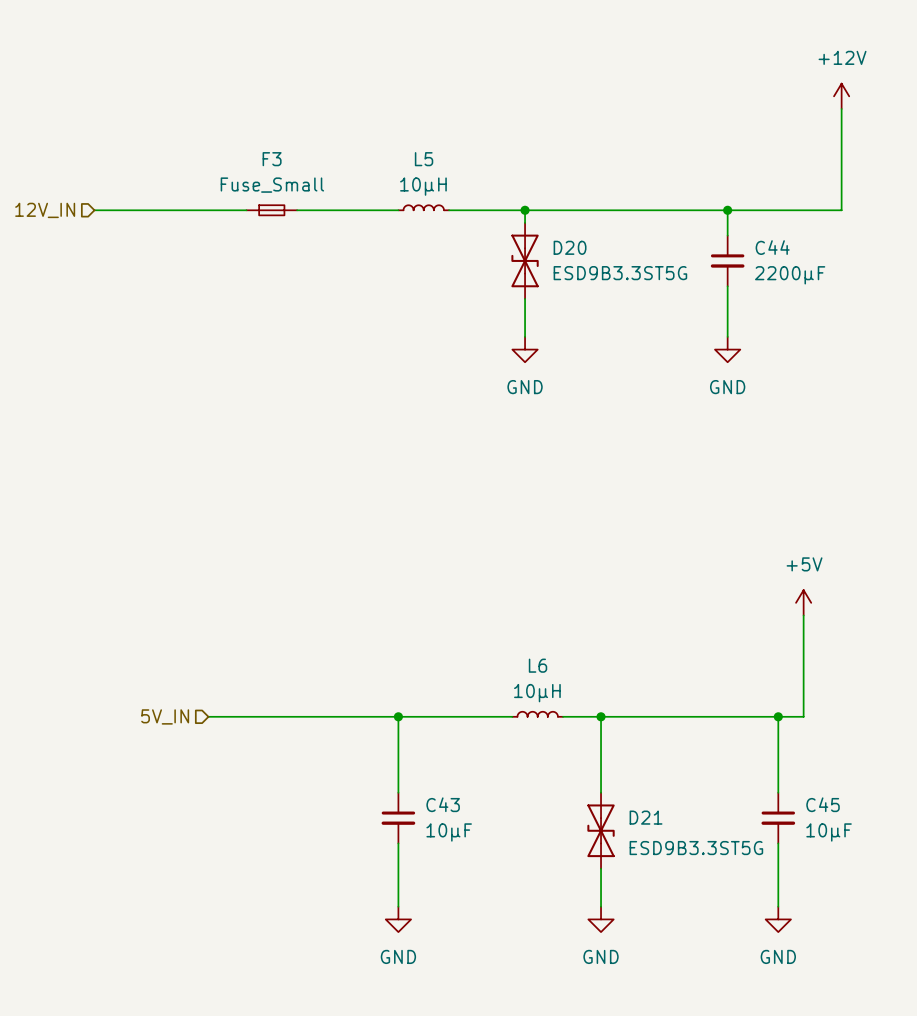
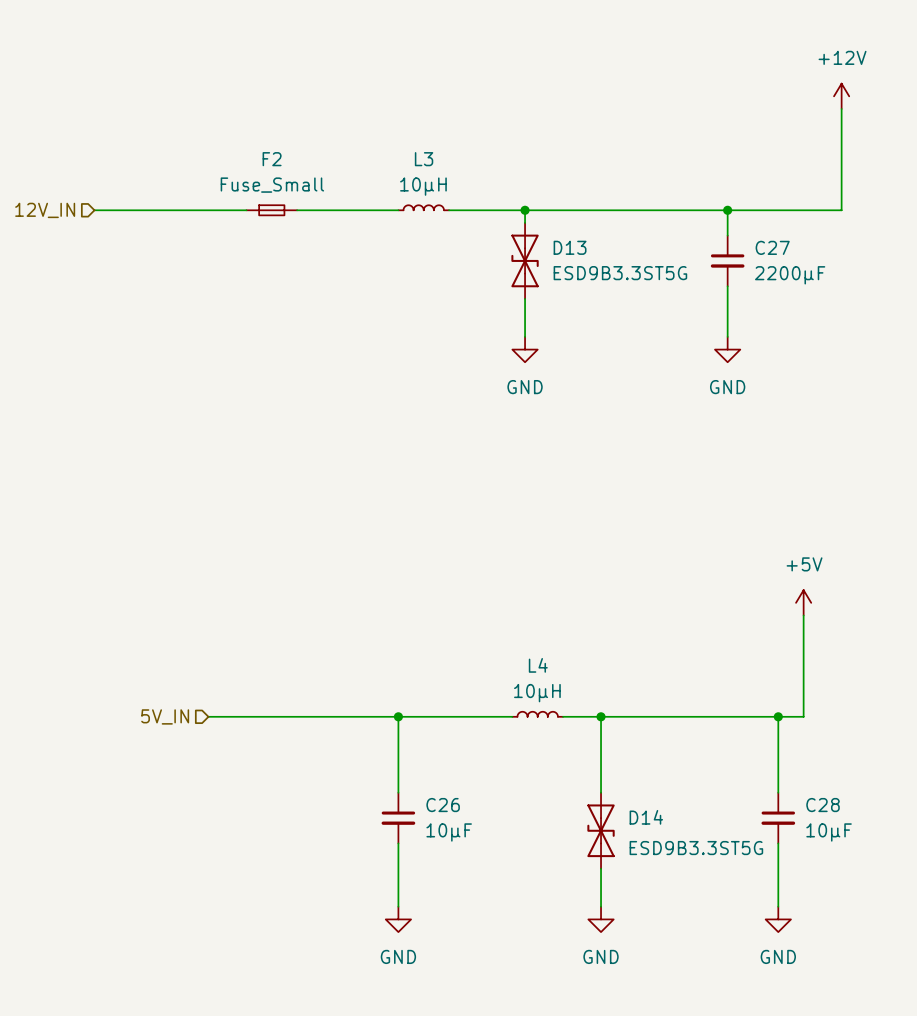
F3 name: F3 (272, 159) -> F2 (272, 159)
L5 name: L5 (424, 159) -> L3 (424, 159)
D20 name: D20 (570, 247) -> D13 (570, 247)
C44 name: C44 (772, 247) -> C27 (772, 247)
L6 name: L6 (538, 665) -> L4 (538, 665)
C43 name: C43 (443, 804) -> C26 (443, 805)
C45 name: C45 (823, 804) -> C28 (823, 805)
D21 name: D21 (646, 817) -> D14 (646, 817)

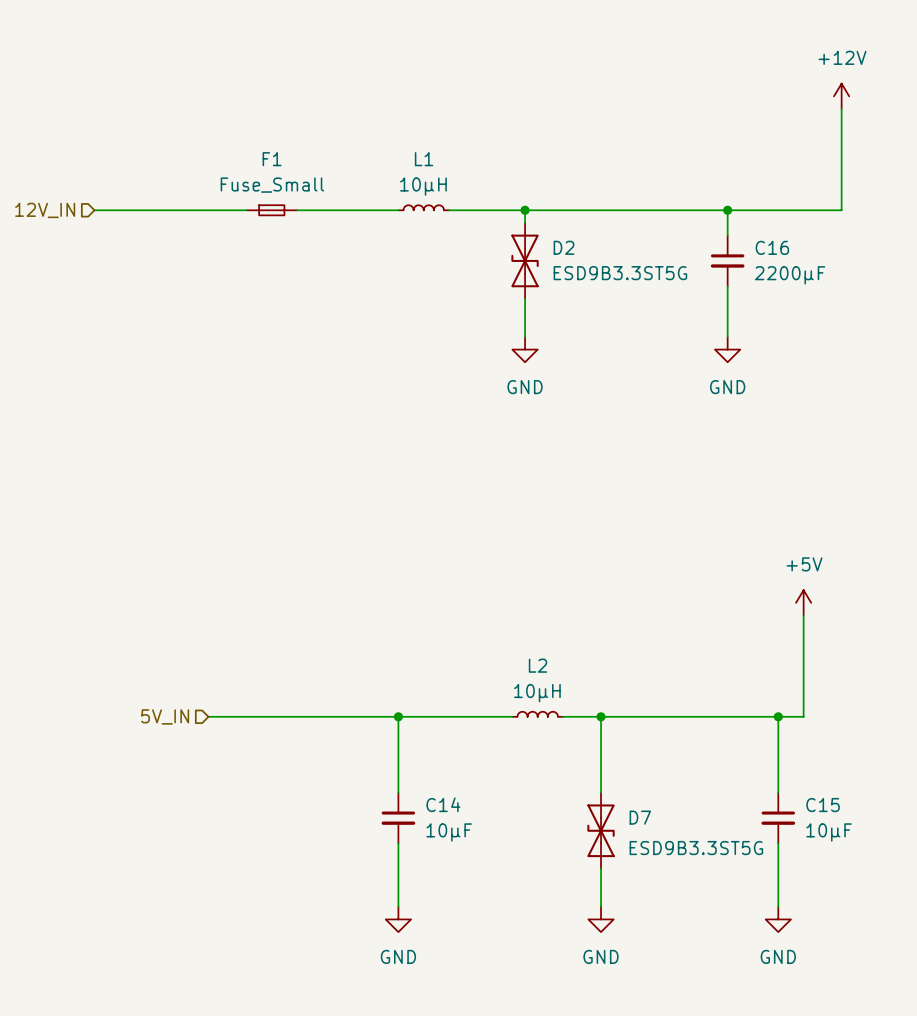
F2 name: F2 (272, 159) -> F1 (272, 159)
L3 name: L3 (424, 159) -> L1 (424, 159)
D13 name: D13 (570, 247) -> D2 (564, 247)
C27 name: C27 (772, 247) -> C16 (772, 247)
L4 name: L4 (538, 665) -> L2 (538, 665)
C26 name: C26 (443, 805) -> C14 (443, 804)
C28 name: C28 (823, 805) -> C15 (823, 805)
D14 name: D14 (646, 817) -> D7 (640, 817)

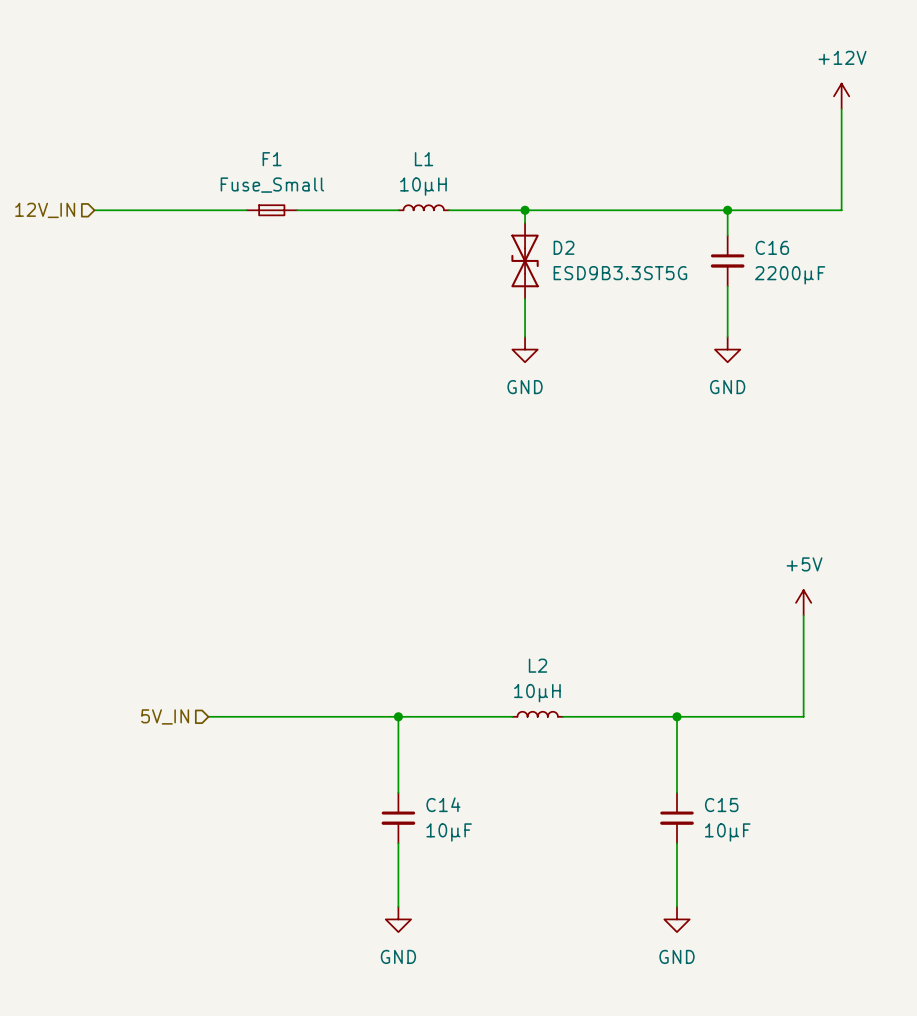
wire: (601, 716) (601, 792) -> none
junction: (601, 716) -> none
junction: none -> (677, 716)
wire: (778, 716) (778, 792) -> (677, 716) (677, 792)
junction: (778, 716) -> none
C15 position: (778, 818) -> (677, 818)
D7: ESD9B3.3ST5G (601, 830) -> none
wire: (778, 843) (778, 906) -> (677, 843) (677, 906)
wire: (601, 868) (601, 906) -> none
power symbol: GND (601, 919) -> none
power symbol: none -> GND (677, 919)
power symbol: GND (778, 919) -> none

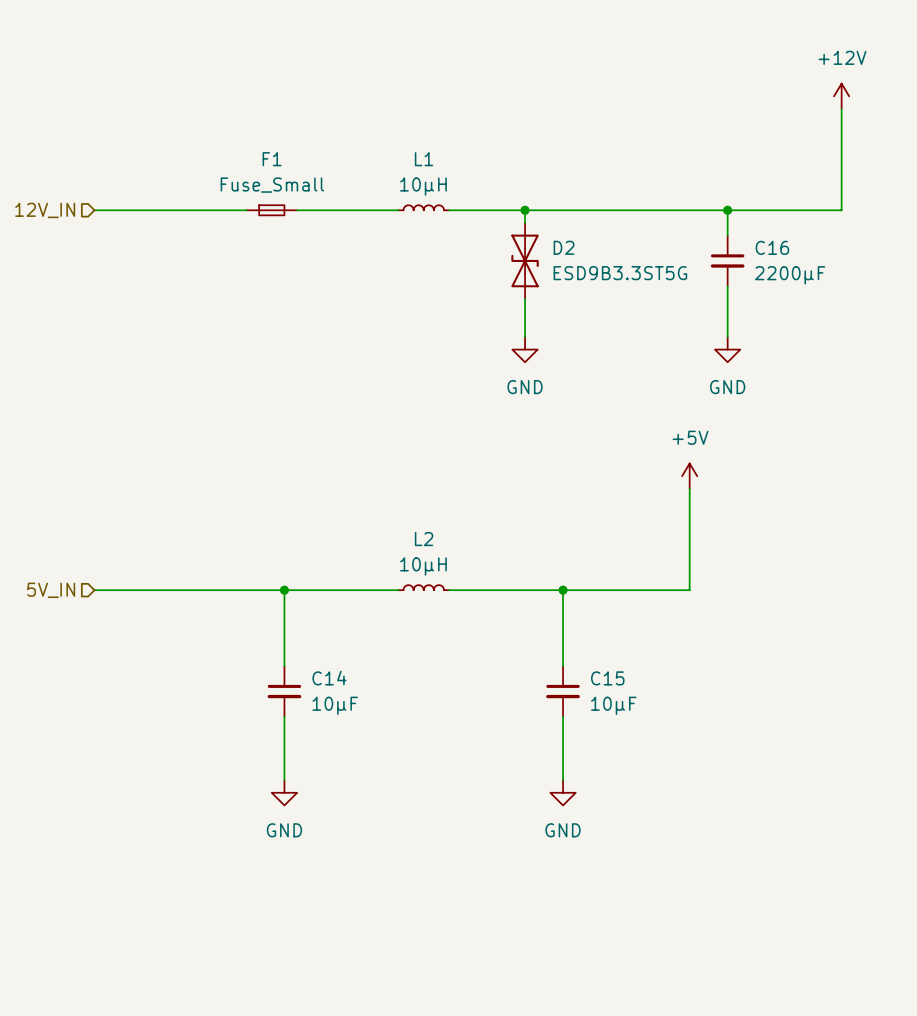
wire: none -> (689, 488) (689, 590) (449, 590)
junction: none -> (284, 590)
junction: none -> (563, 590)
power symbol position: +5V (803, 602) -> +5V (689, 476)
wire: (803, 615) (803, 716) (563, 716) -> (563, 780) (563, 716)
L2 position: (537, 714) -> (423, 587)
hierarchical label position: 5V_IN (165, 716) -> 5V_IN (51, 590)
wire: (208, 716) (512, 716) -> (94, 590) (398, 590)
wire: (398, 716) (398, 792) -> (284, 590) (284, 666)
junction: (398, 716) -> none
wire: (677, 716) (677, 792) -> (563, 590) (563, 666)
junction: (677, 716) -> none
power symbol: none -> GND (284, 792)
power symbol: none -> GND (563, 792)
C14 position: (398, 818) -> (284, 691)
C15 position: (677, 818) -> (563, 691)
wire: (398, 843) (398, 906) -> (284, 716) (284, 780)
wire: (677, 843) (677, 906) -> none
power symbol: GND (398, 919) -> none
power symbol: GND (677, 919) -> none

